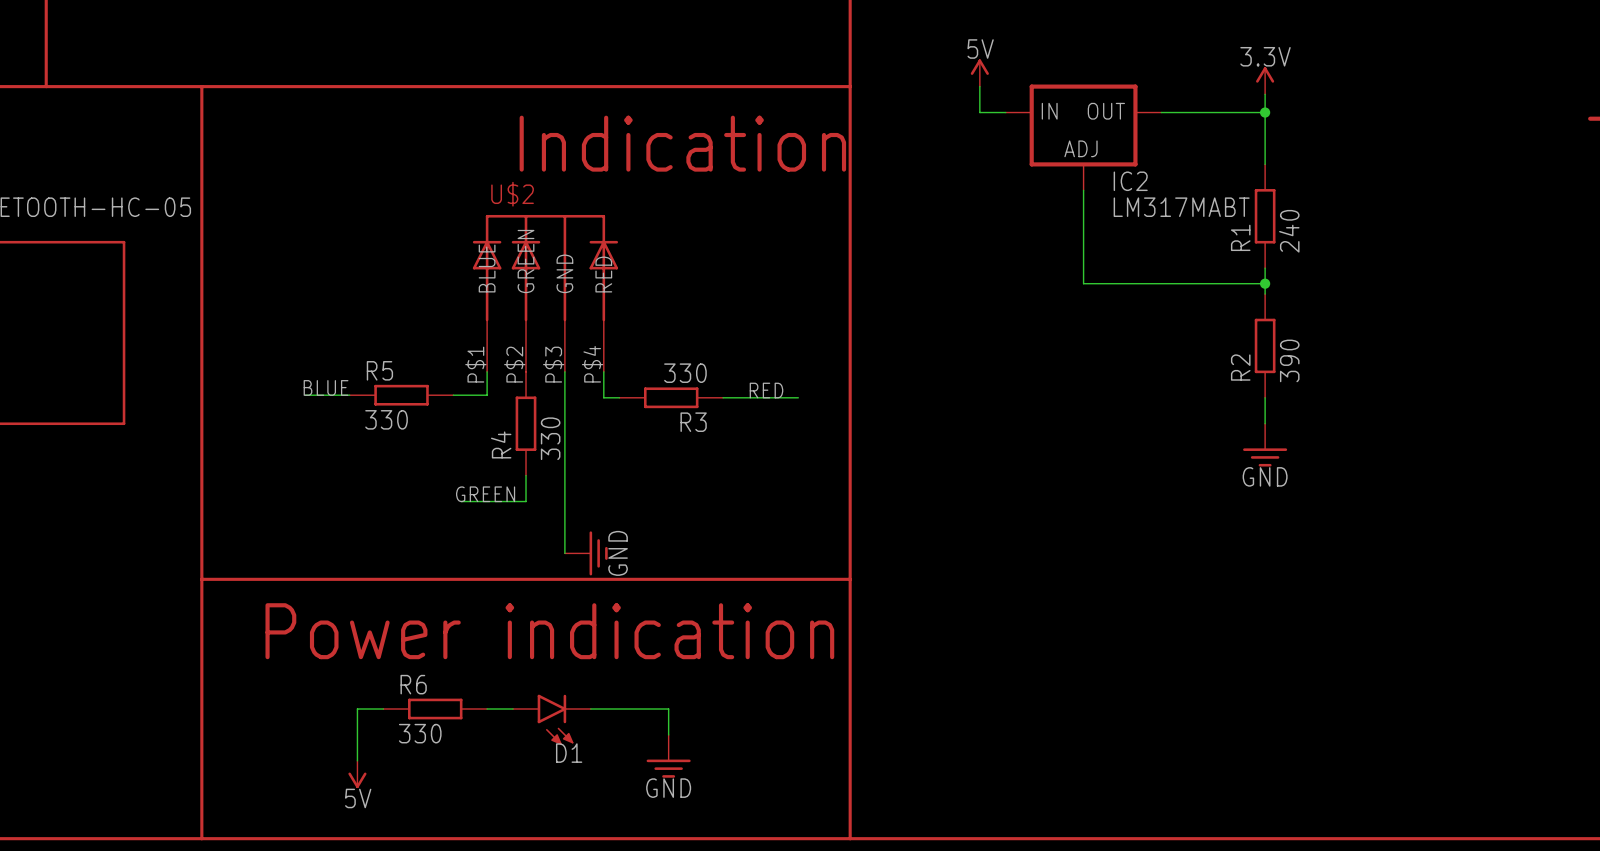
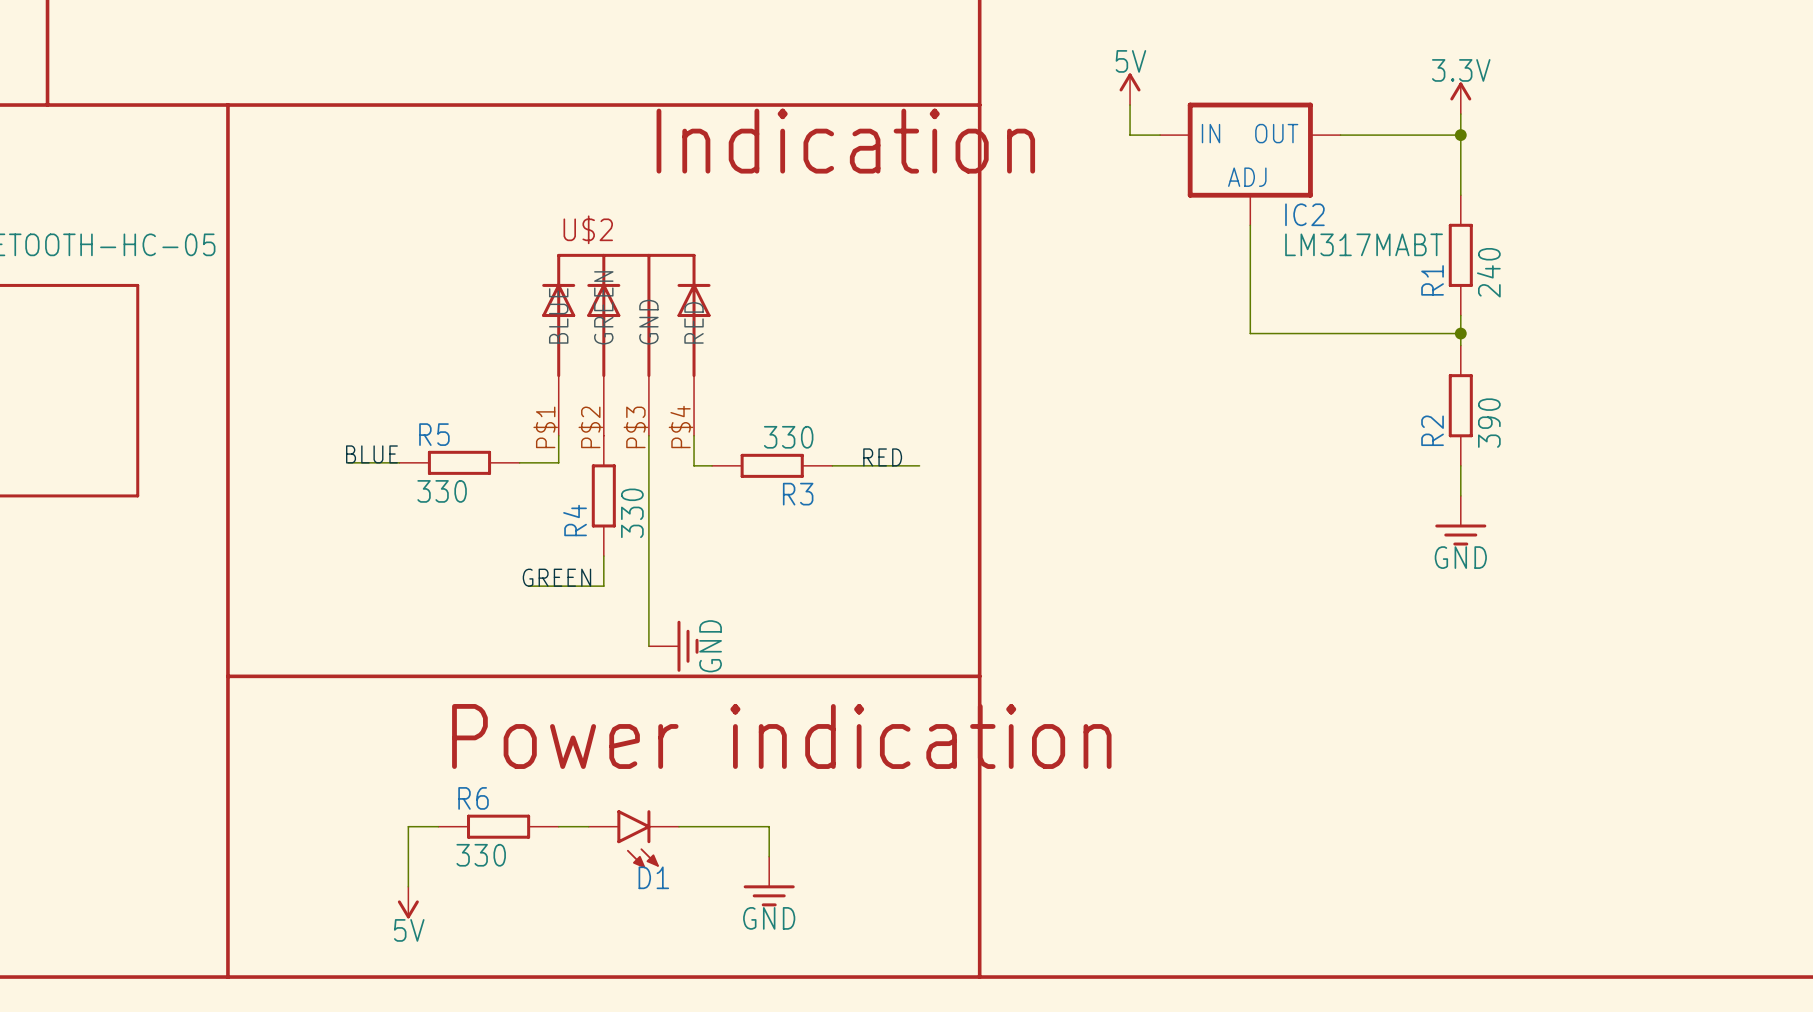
text position: Indication (682, 143) -> Indication (845, 141)
text position: Power indication (549, 631) -> Power indication (781, 736)

